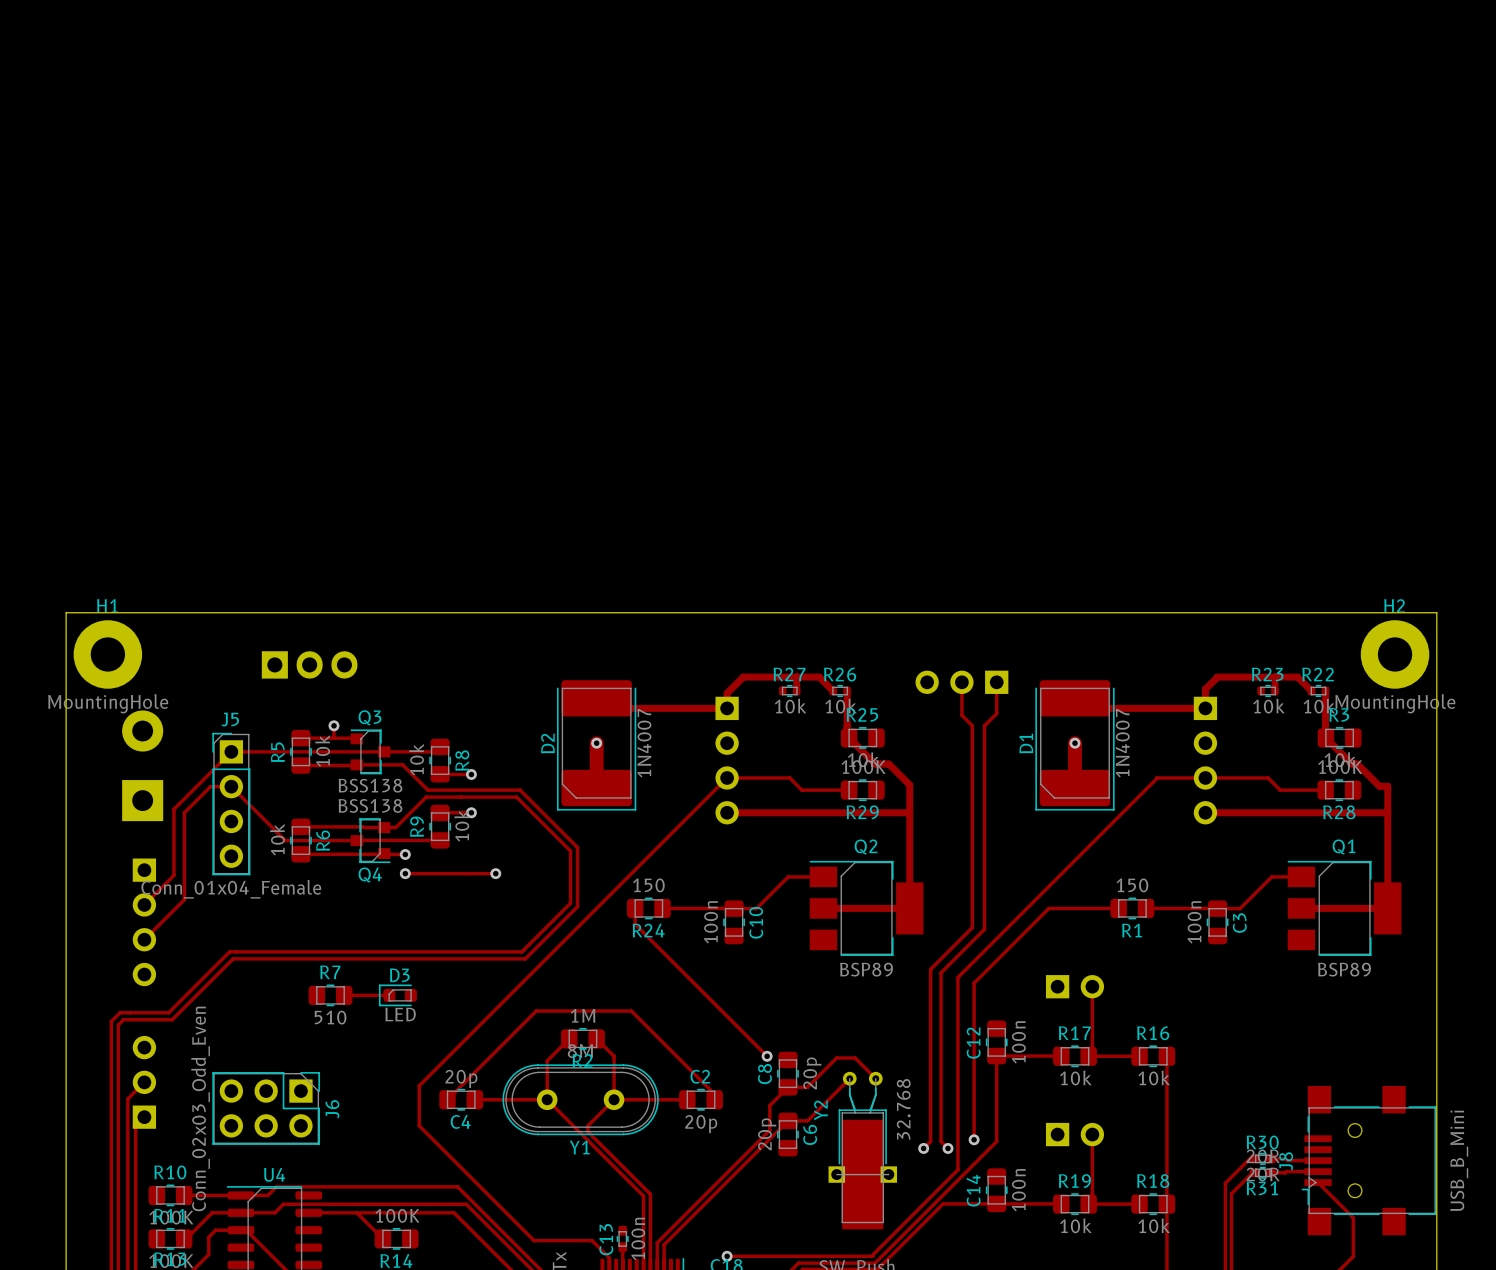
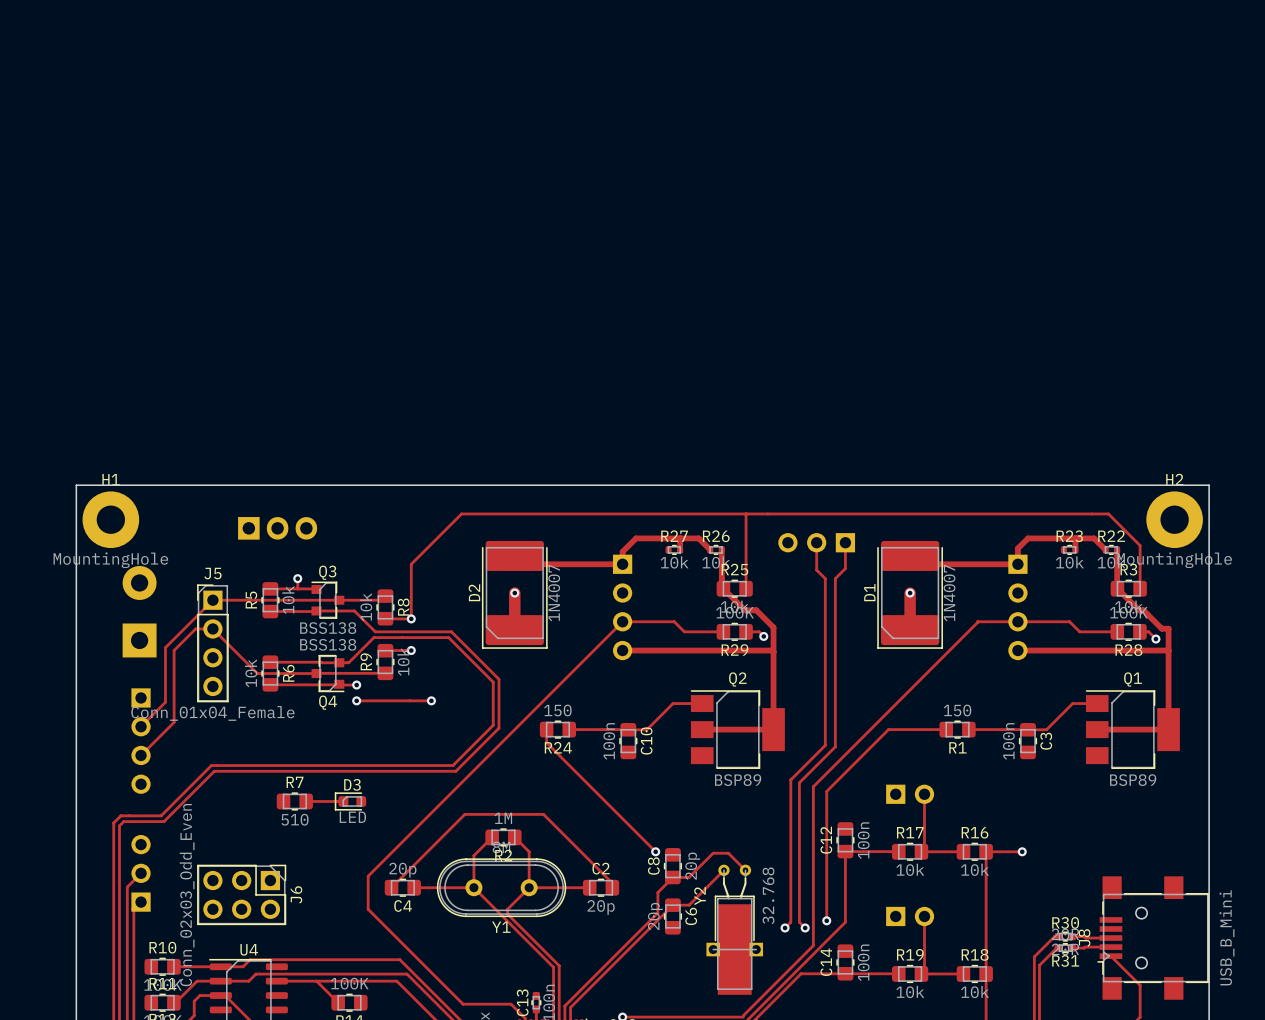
track: none -> (746, 513) (746, 588)
track: none -> (1140, 588) (1140, 545) (1108, 513) (461, 513) (411, 564) (411, 618)
track: none -> (746, 631) (759, 631) (763, 636)
track: none -> (1139, 631) (1148, 631) (1155, 639)
via: none -> (763, 636)
via: none -> (1155, 639)
track: none -> (986, 851) (1022, 851)
via: none -> (1022, 851)

